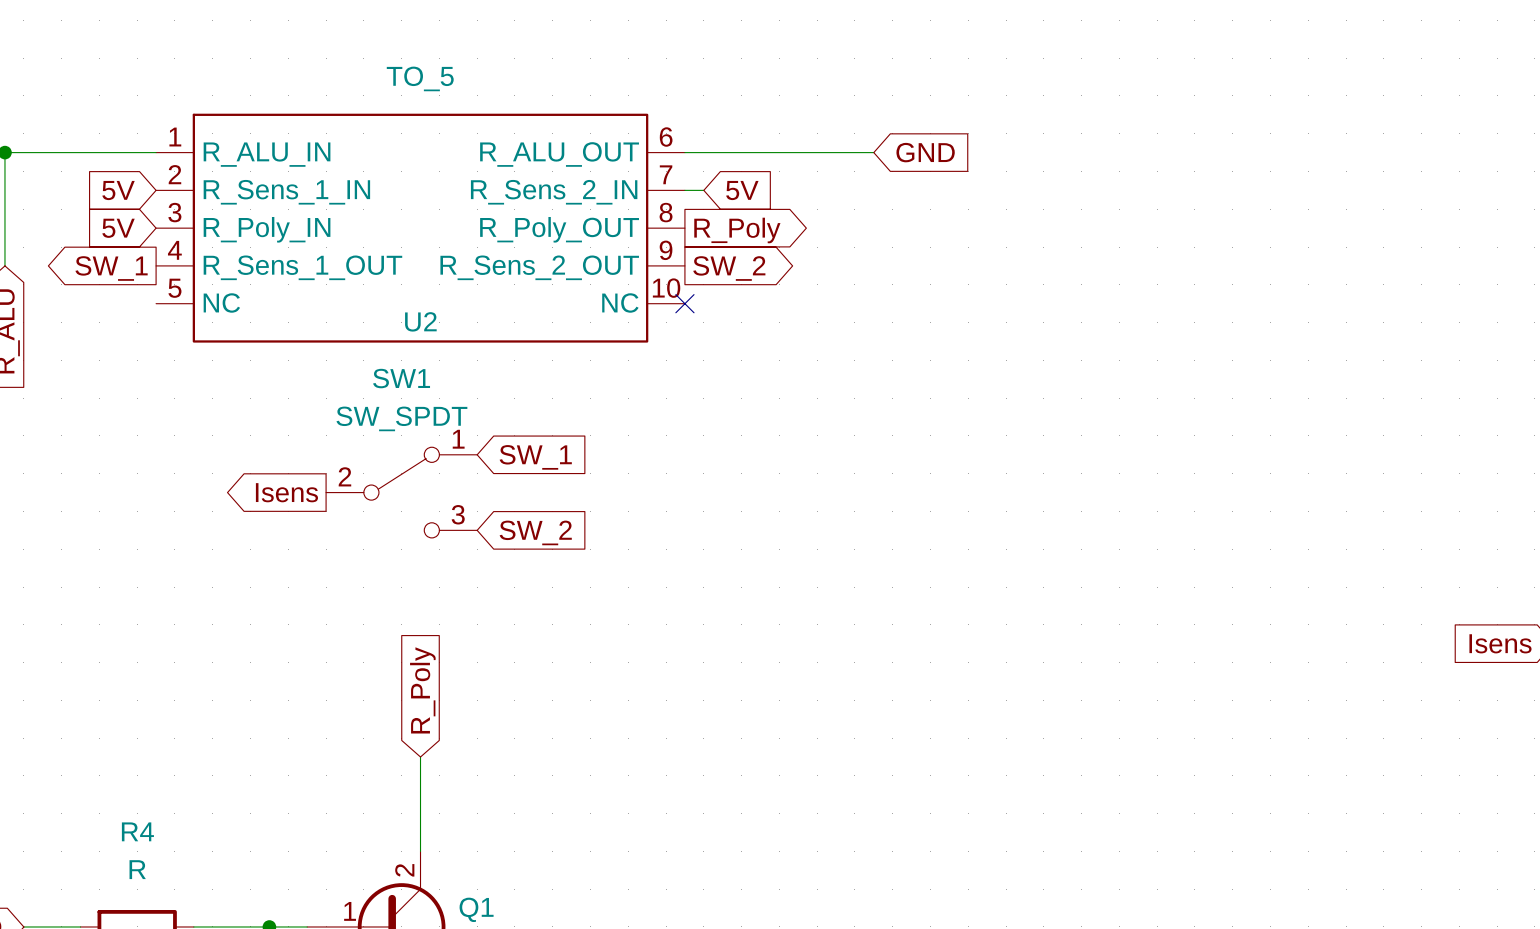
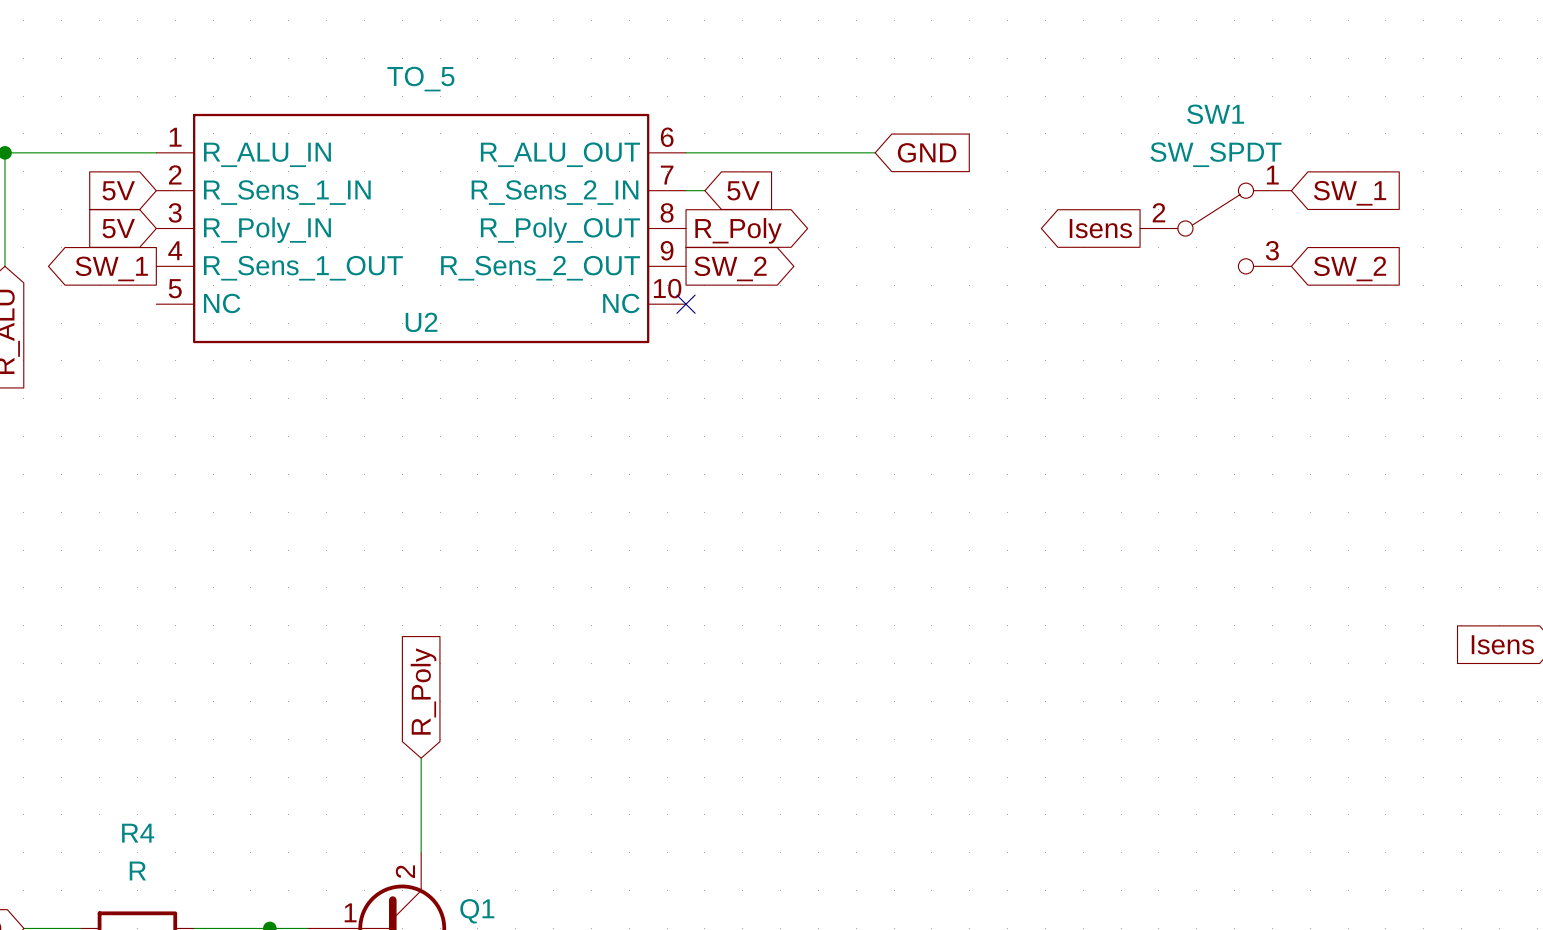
global label: none -> SW_1 (1350, 193)
global label: none -> Isens (1100, 228)
global label: none -> SW_2 (1350, 268)
global label: SW_1 (535, 457) -> none
global label: Isens (286, 492) -> none
SW1 position: (401, 492) -> (1215, 228)
global label: SW_2 (535, 532) -> none

